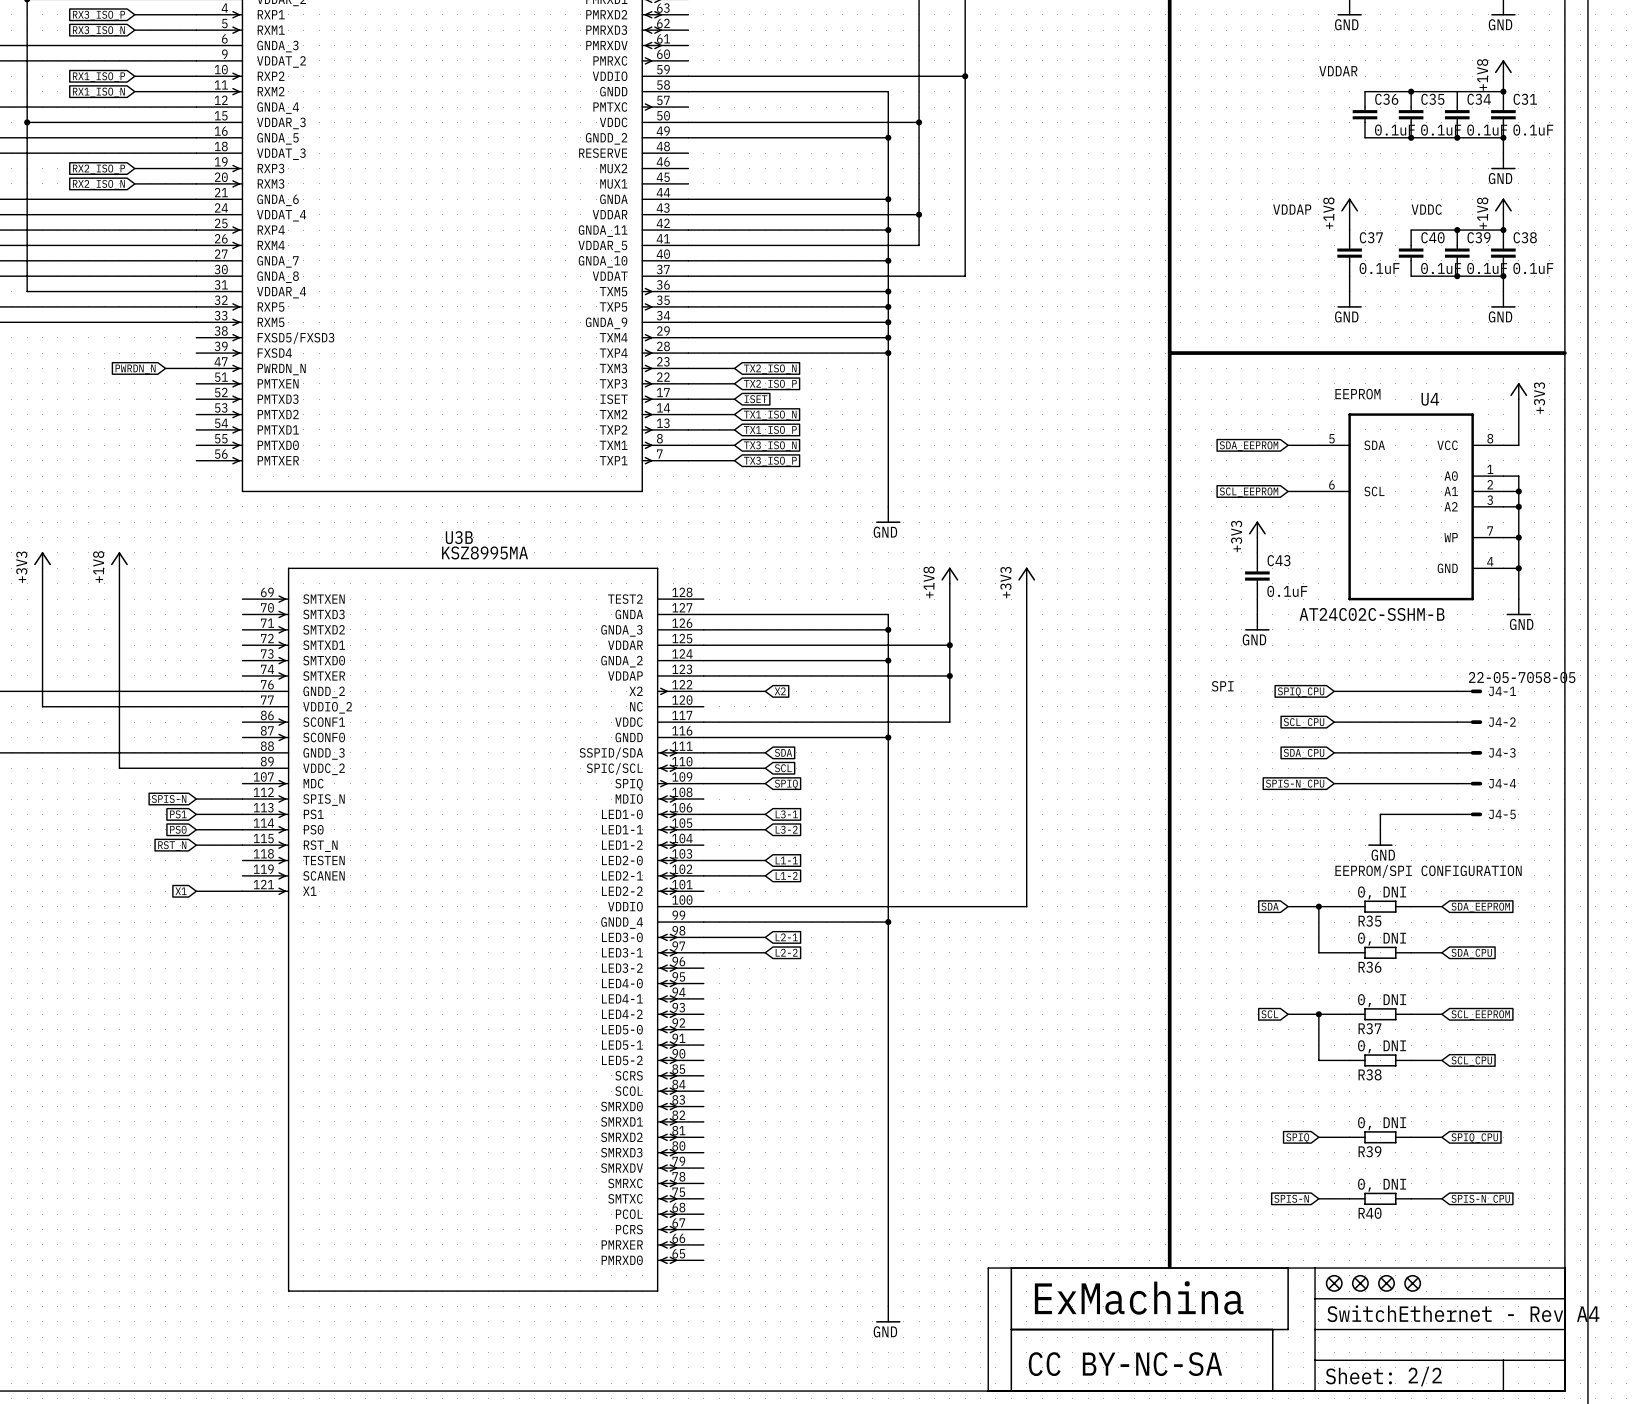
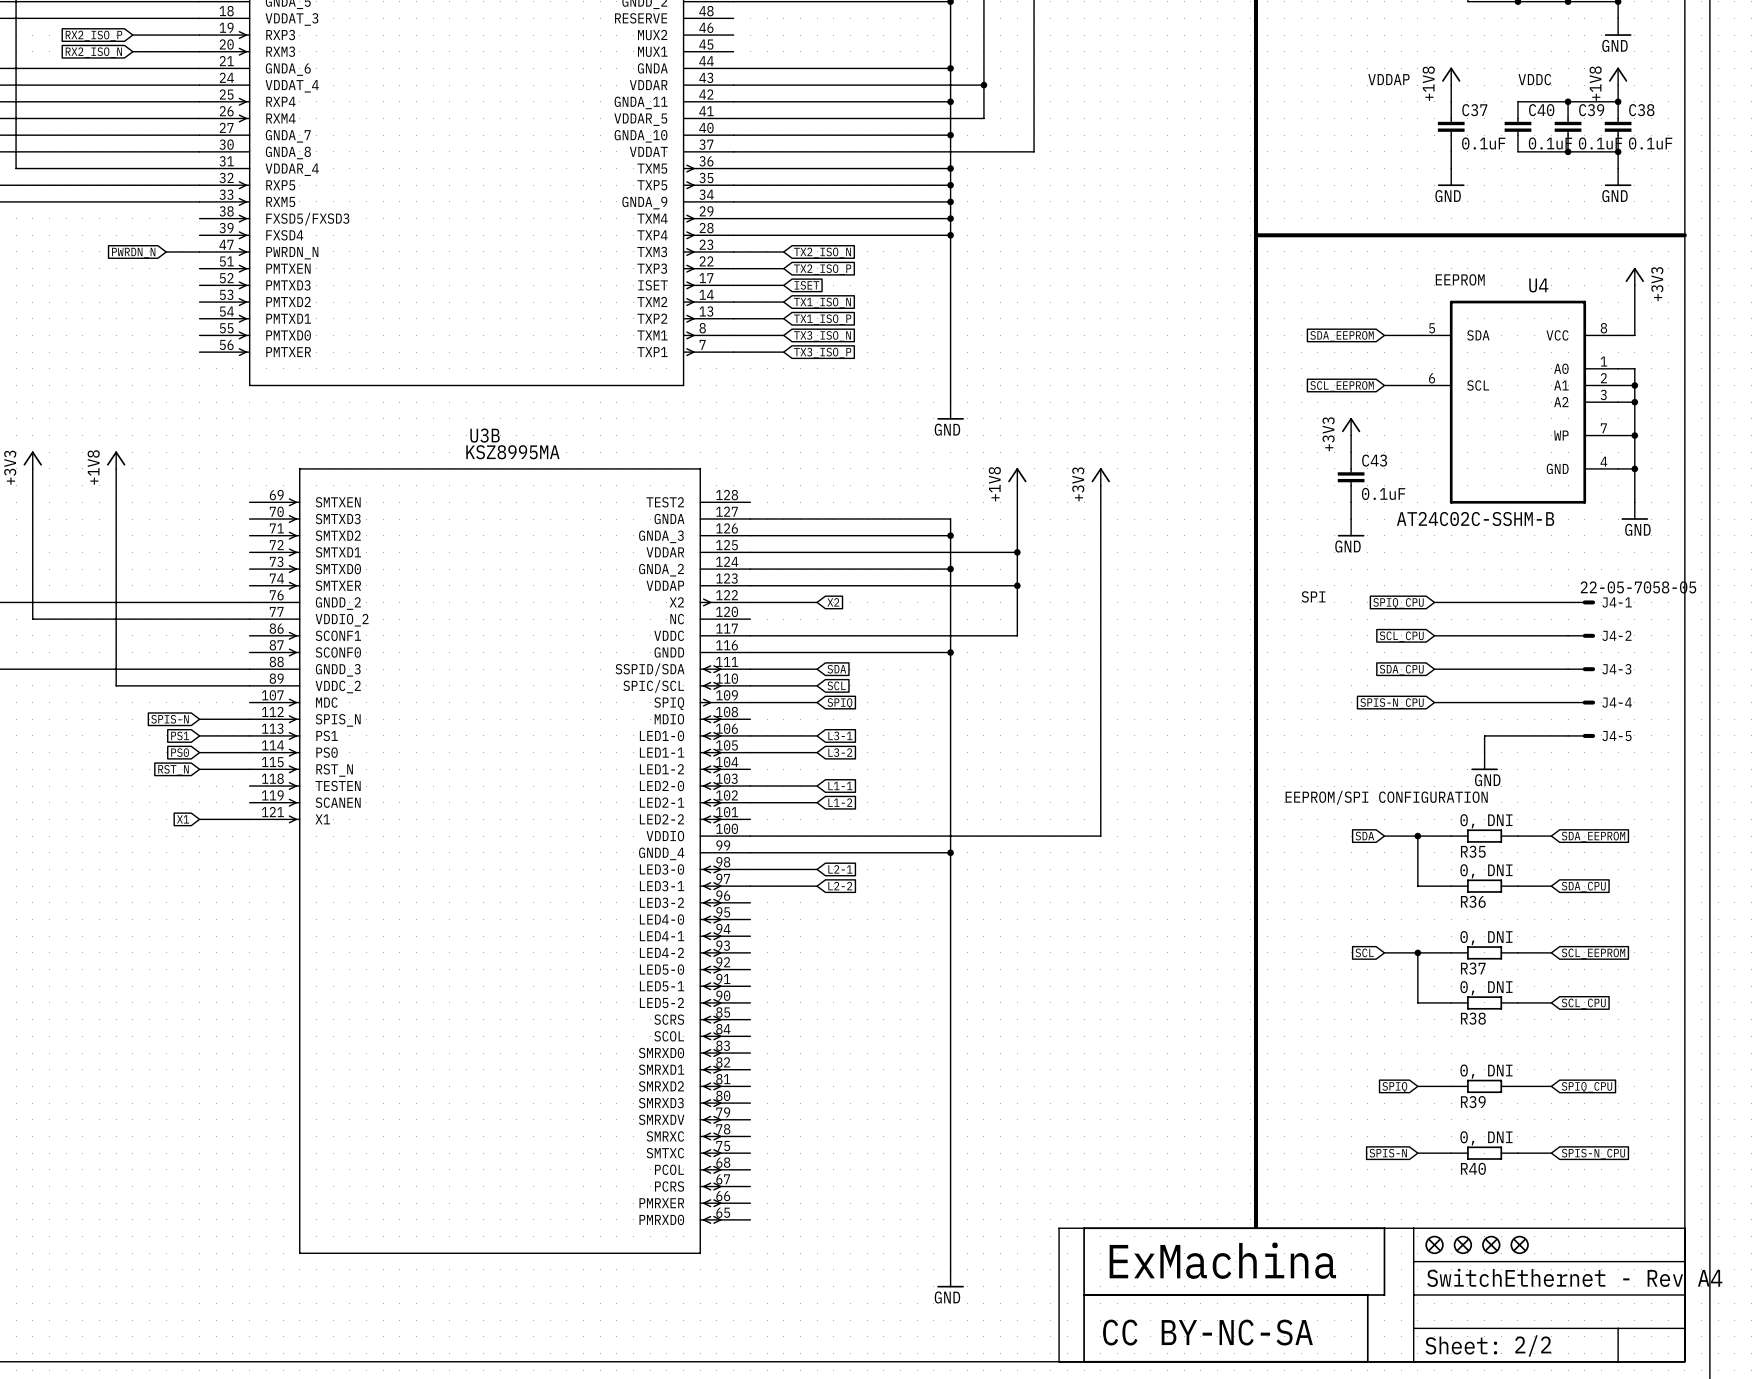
text position: EEPROM/SPI CONFIGURATION (1428, 871) -> EEPROM/SPI CONFIGURATION (1386, 797)

